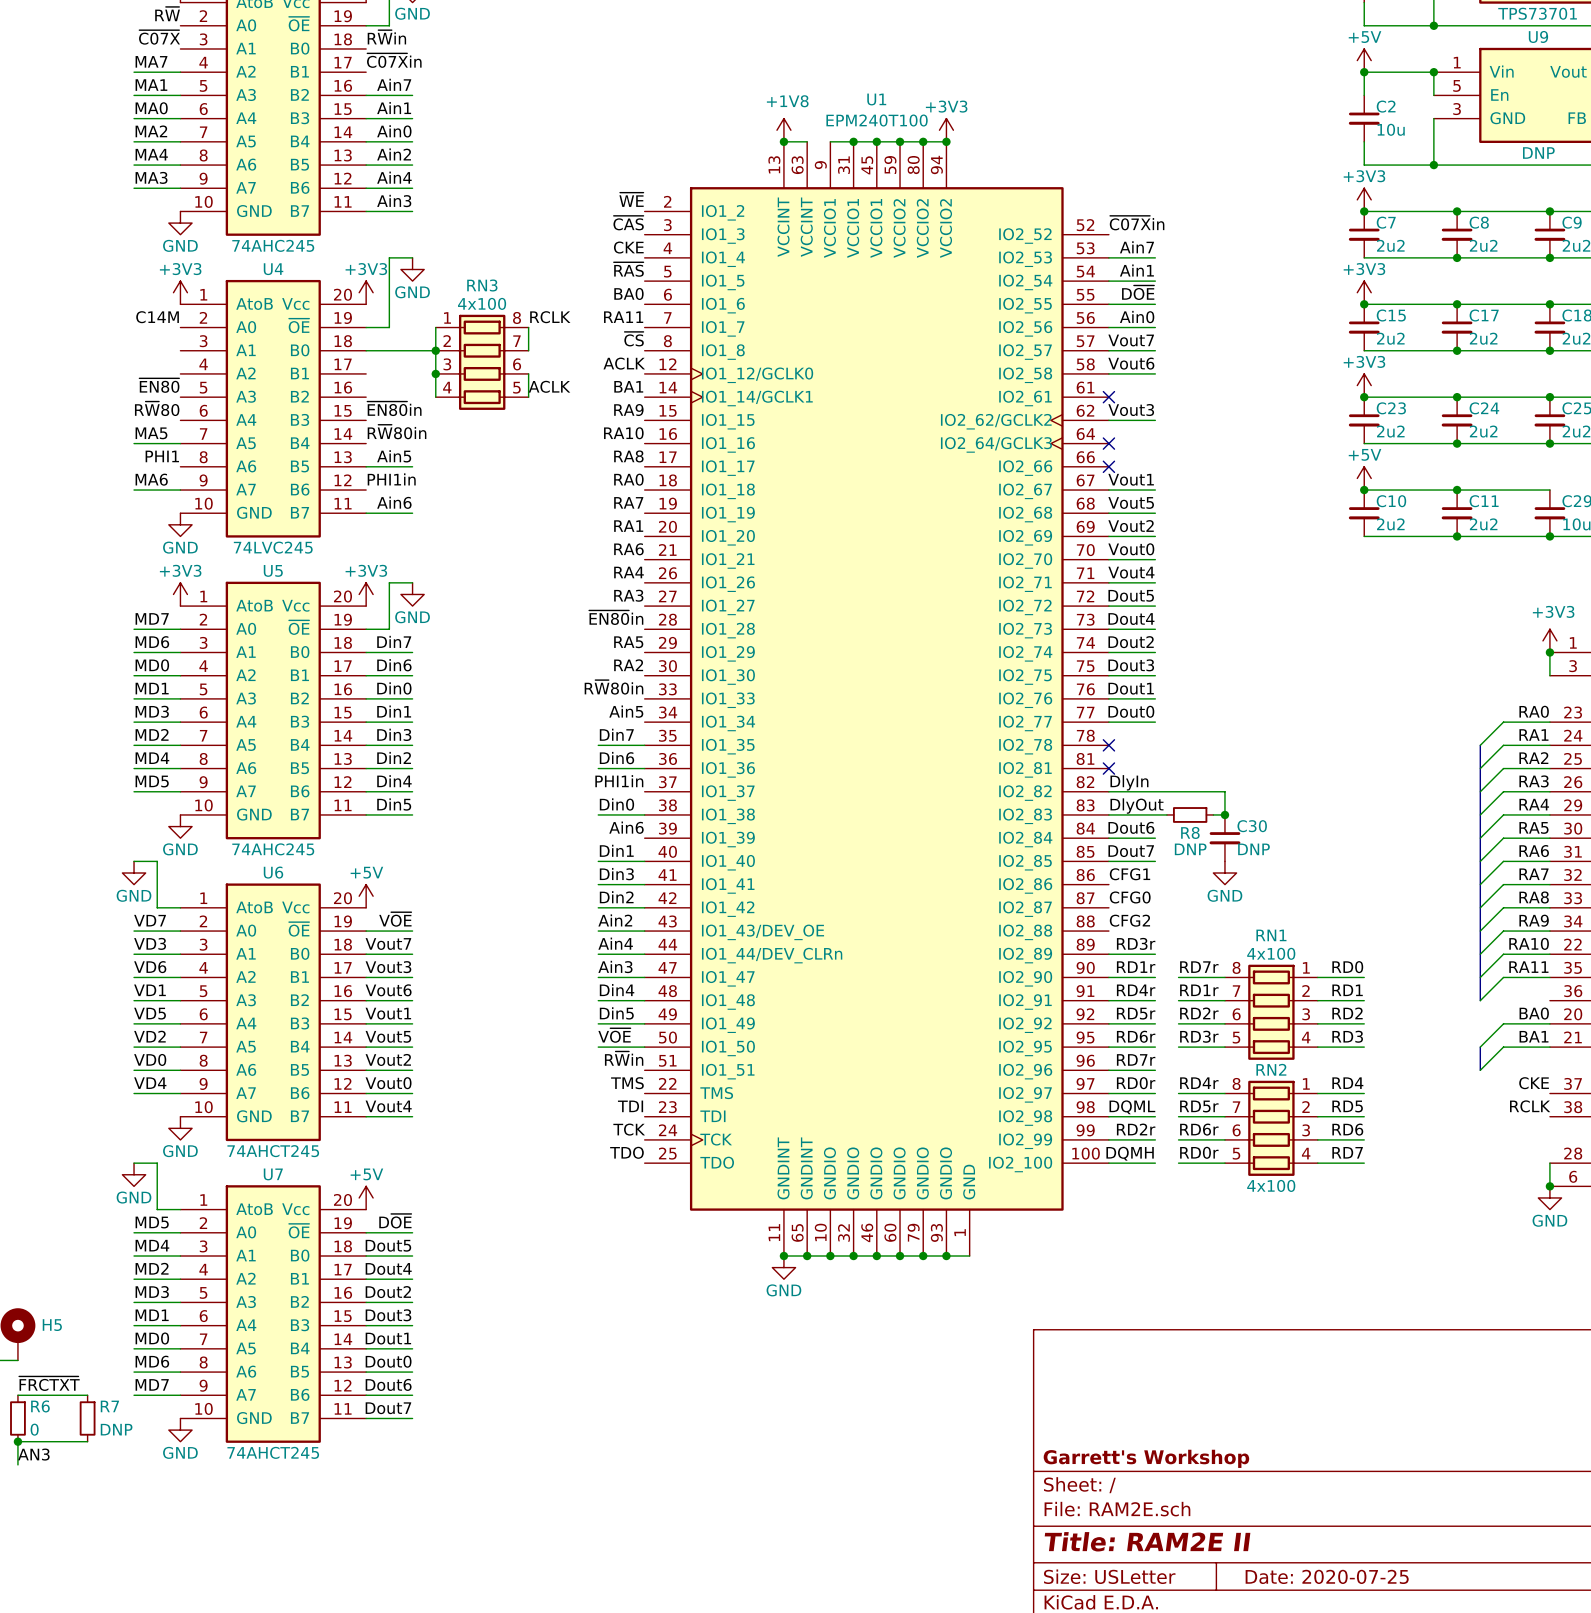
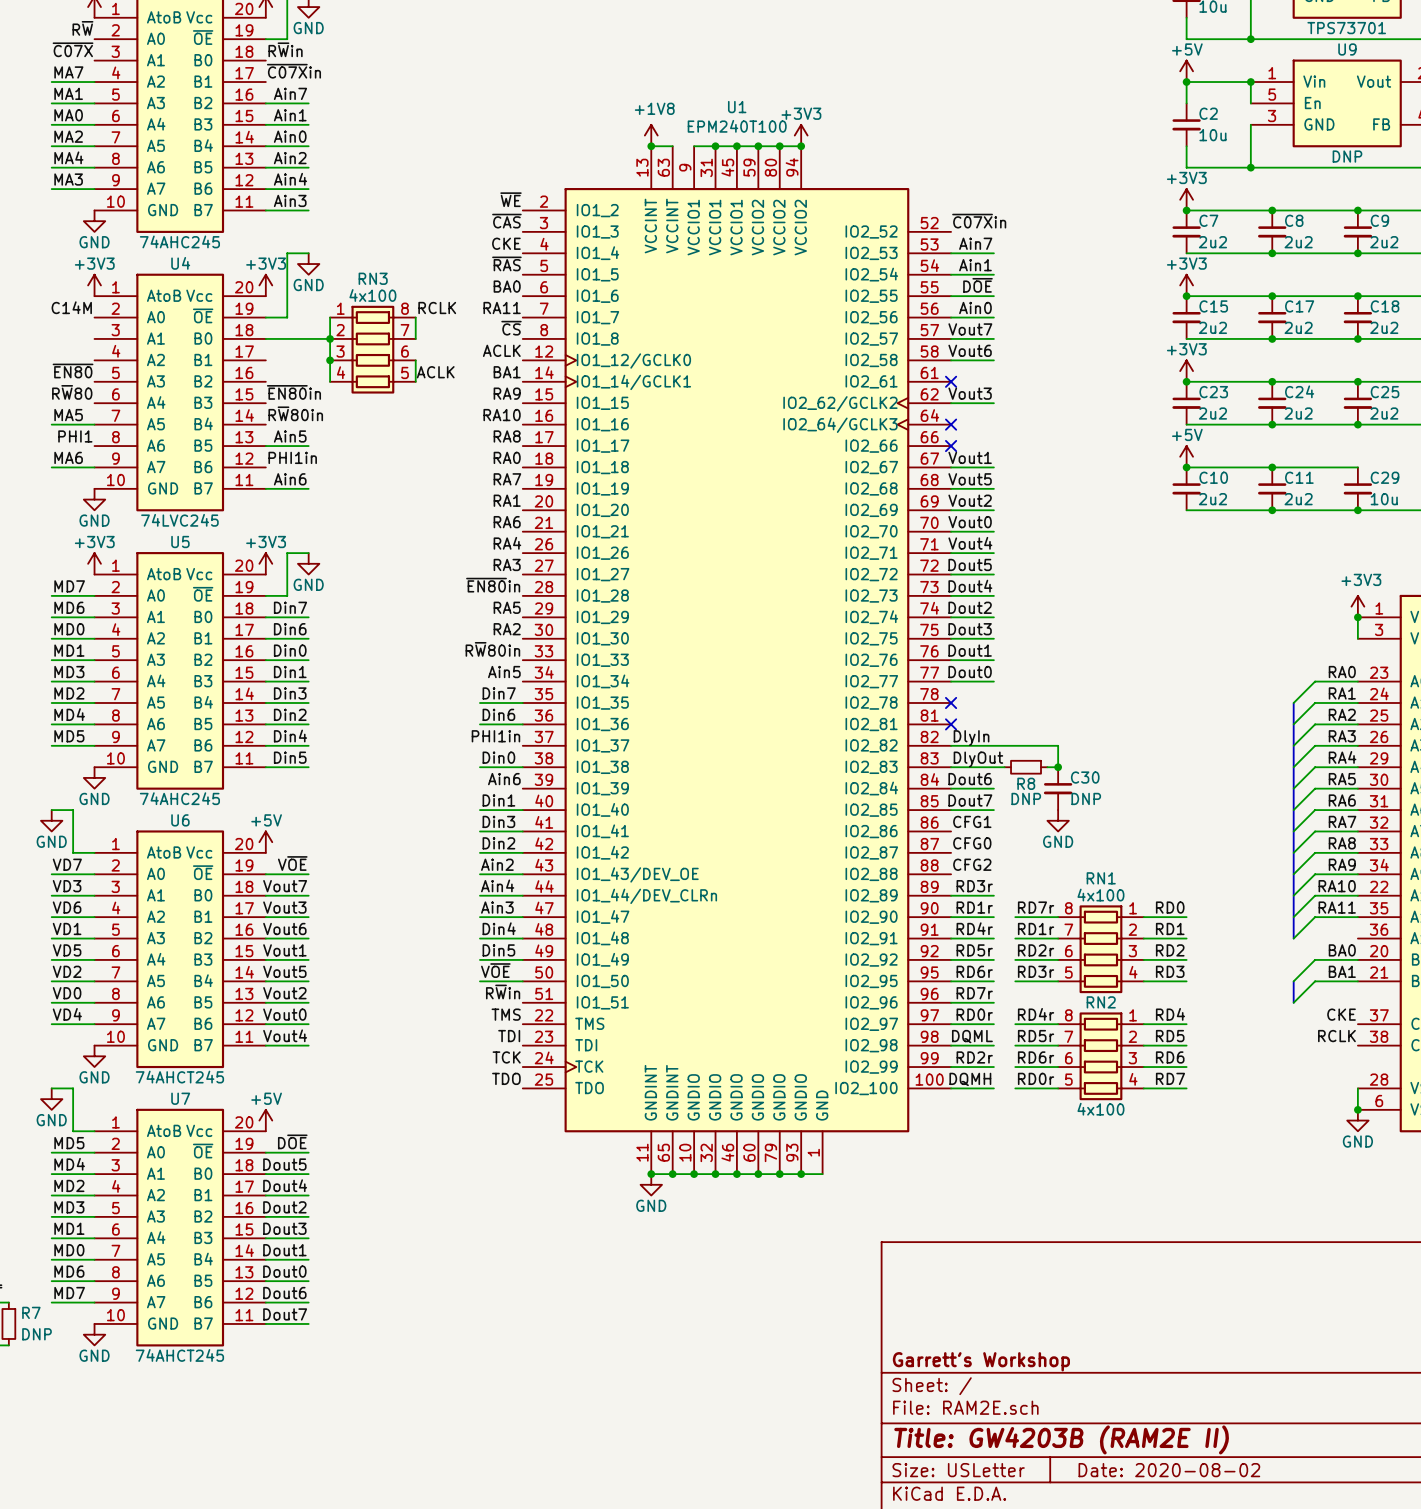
title block: Title: RAM2E II (1147, 1541) -> Title: GW4203B (RAM2E II) (1061, 1439)
title block: Date: 2020-07-25 (1327, 1576) -> Date: 2020-08-02 (1169, 1470)

